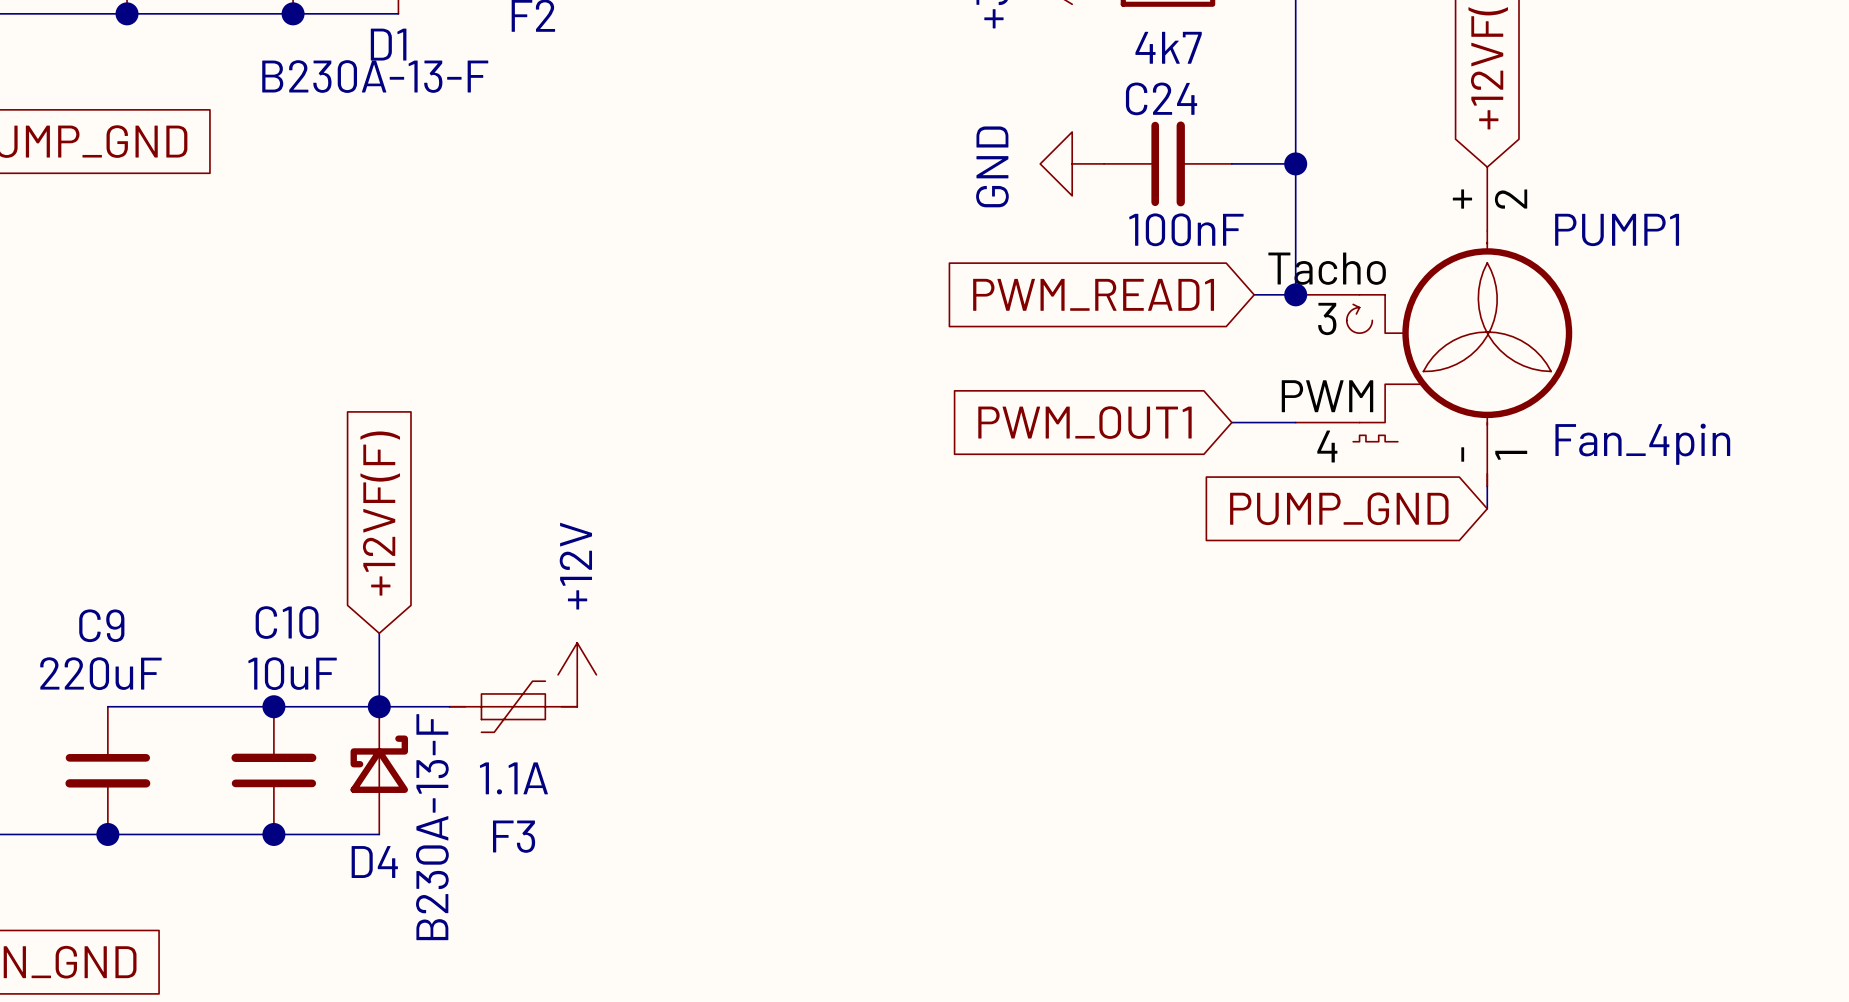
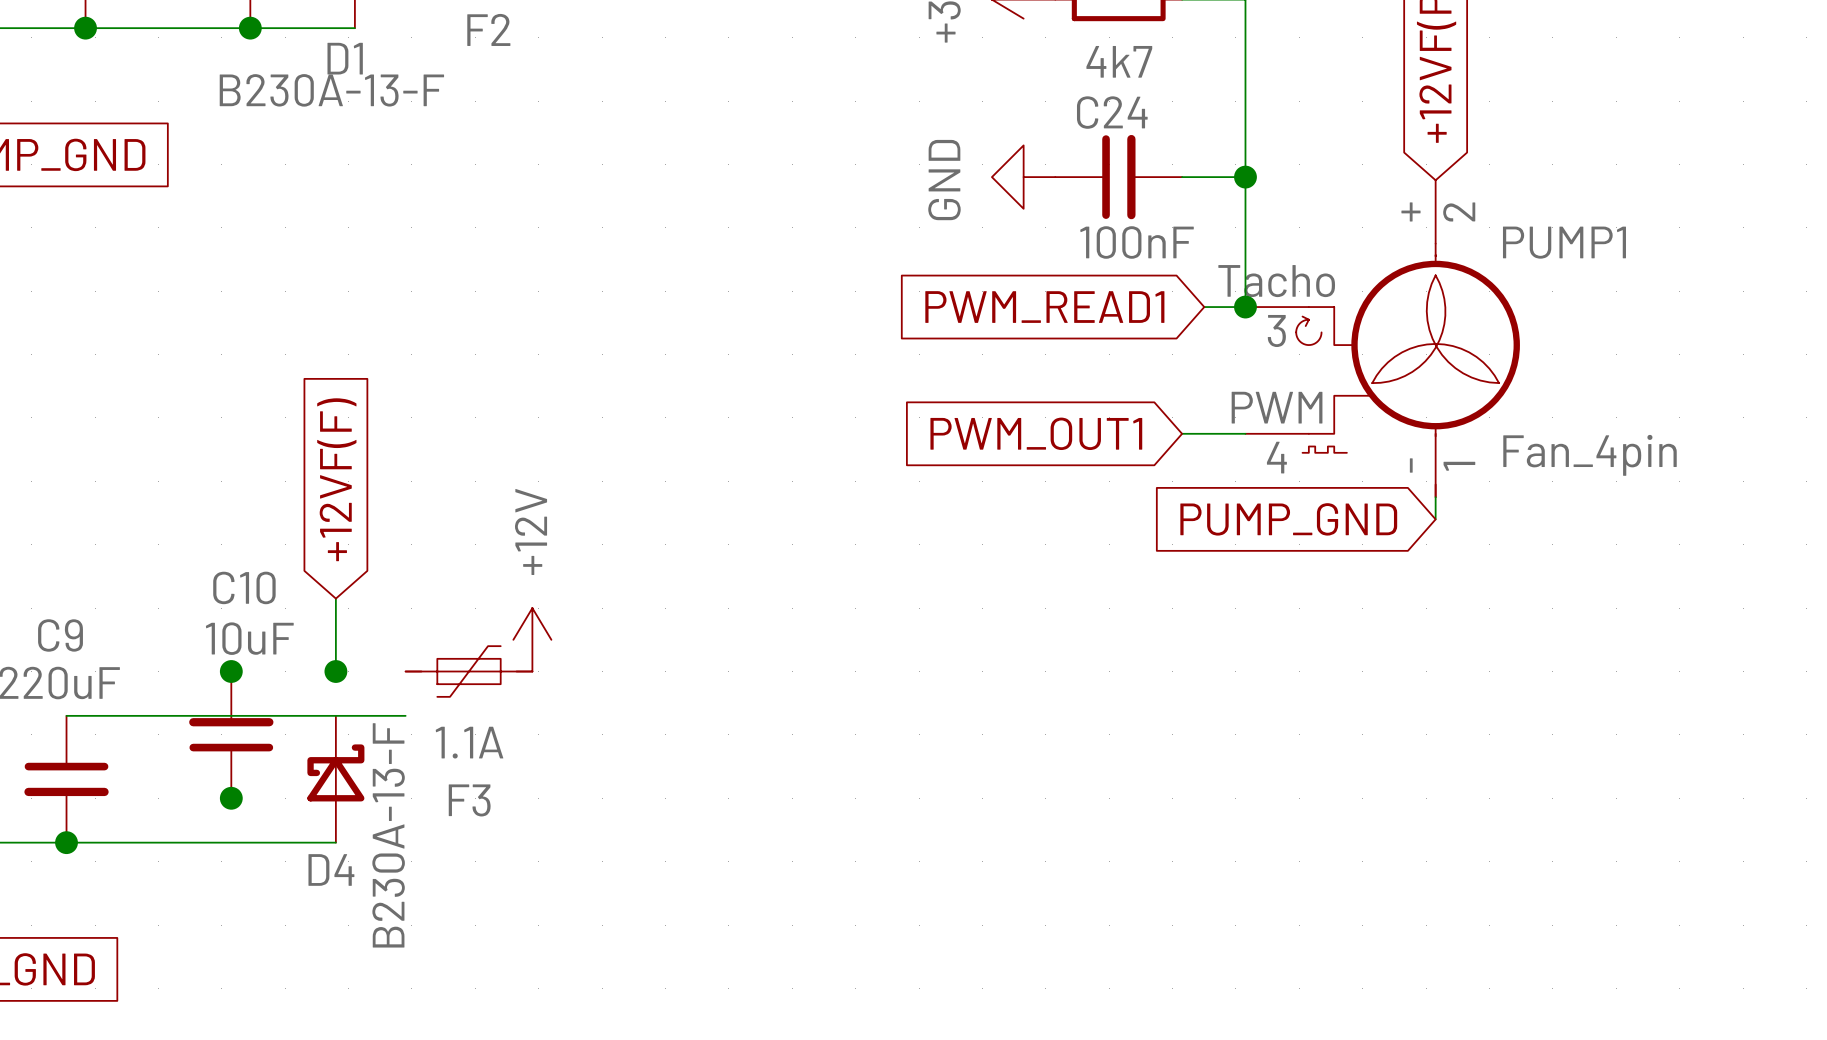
global label position: +12VF(F) (380, 513) -> +12VF(F) (336, 479)
junction: none -> (231, 671)
wire: (379, 662) (379, 706) -> (335, 598) (335, 642)
power symbol position: +12V (577, 674) -> +12V (532, 639)
junction: (273, 706) -> none
junction position: (379, 706) -> (335, 671)
F3 position: (513, 706) -> (469, 671)
C10 position: (273, 770) -> (231, 734)
junction: none -> (231, 798)
junction: (273, 834) -> none

